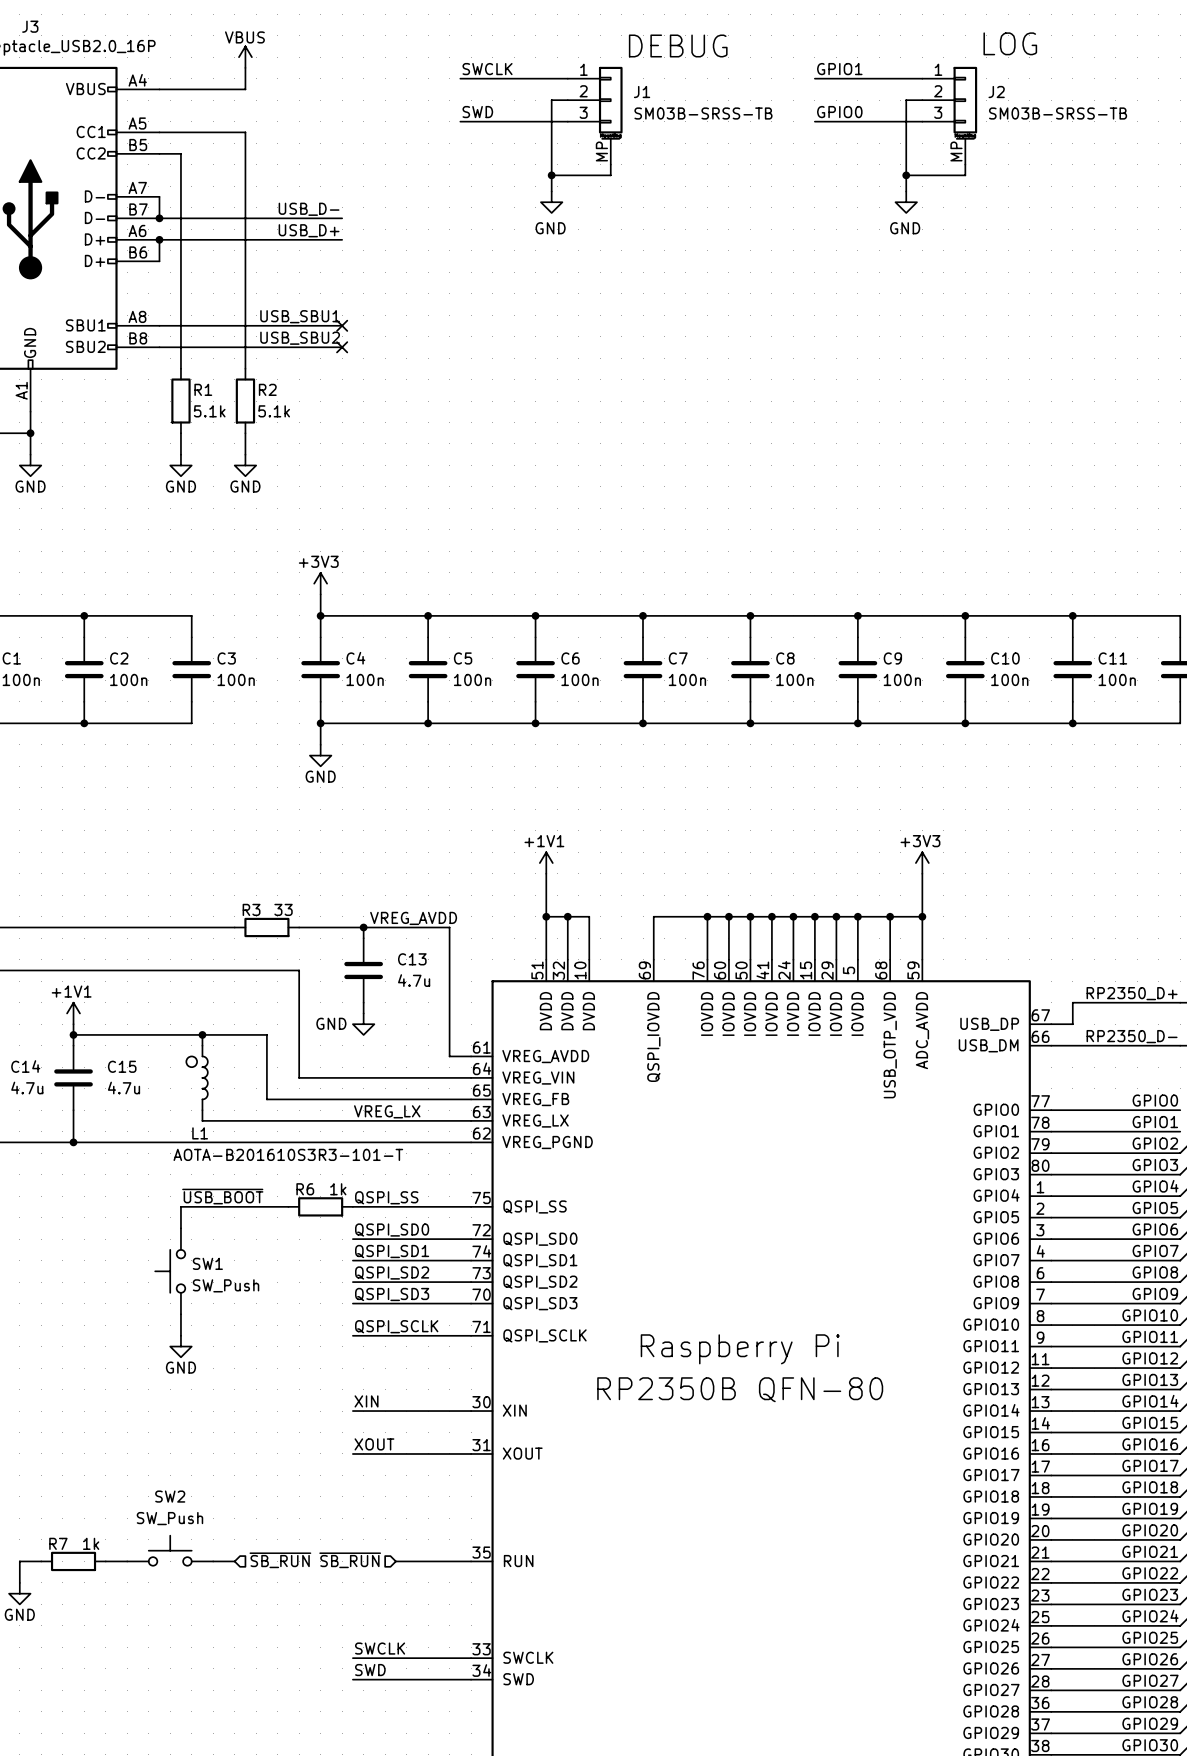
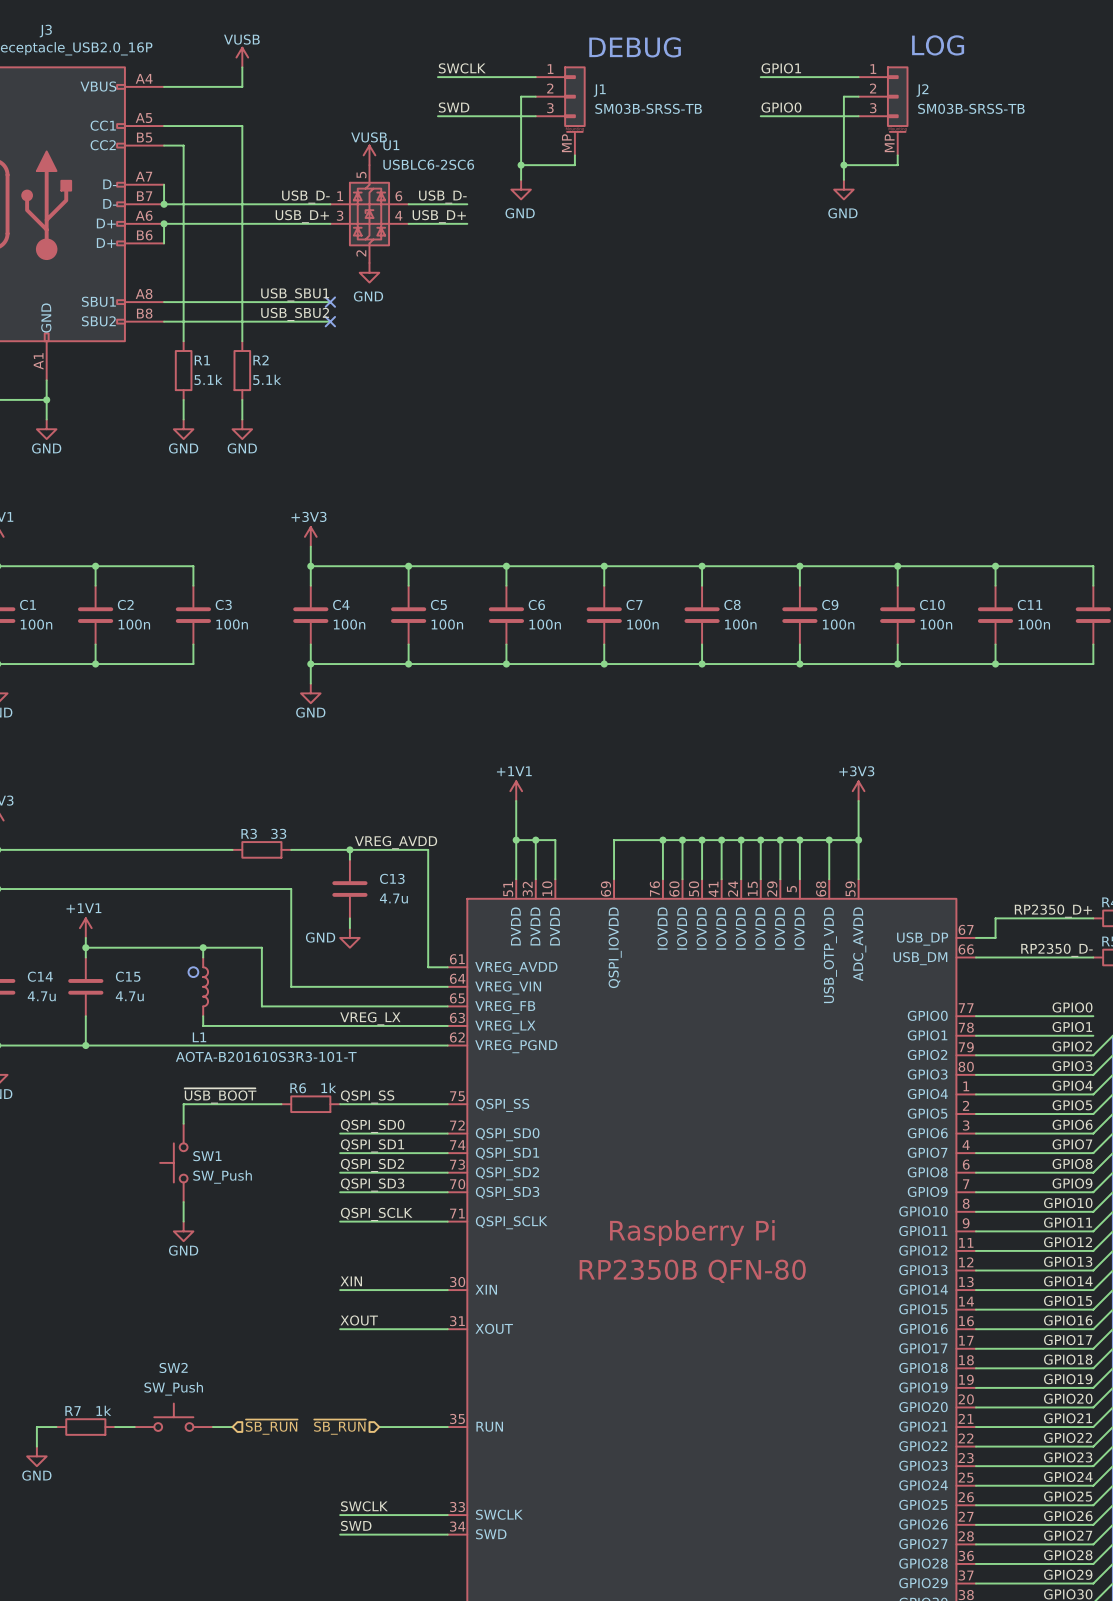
power symbol: VBUS (245, 57) -> VUSB (242, 57)
power symbol: none -> VUSB (369, 155)
label: none -> USB_D- (442, 197)
wire: none -> (408, 204) (467, 204)
U1: none -> USBLC6-2SC6 (369, 214)
label: none -> USB_D+ (439, 216)
wire: none -> (408, 223) (467, 223)
power symbol: none -> GND (369, 272)

